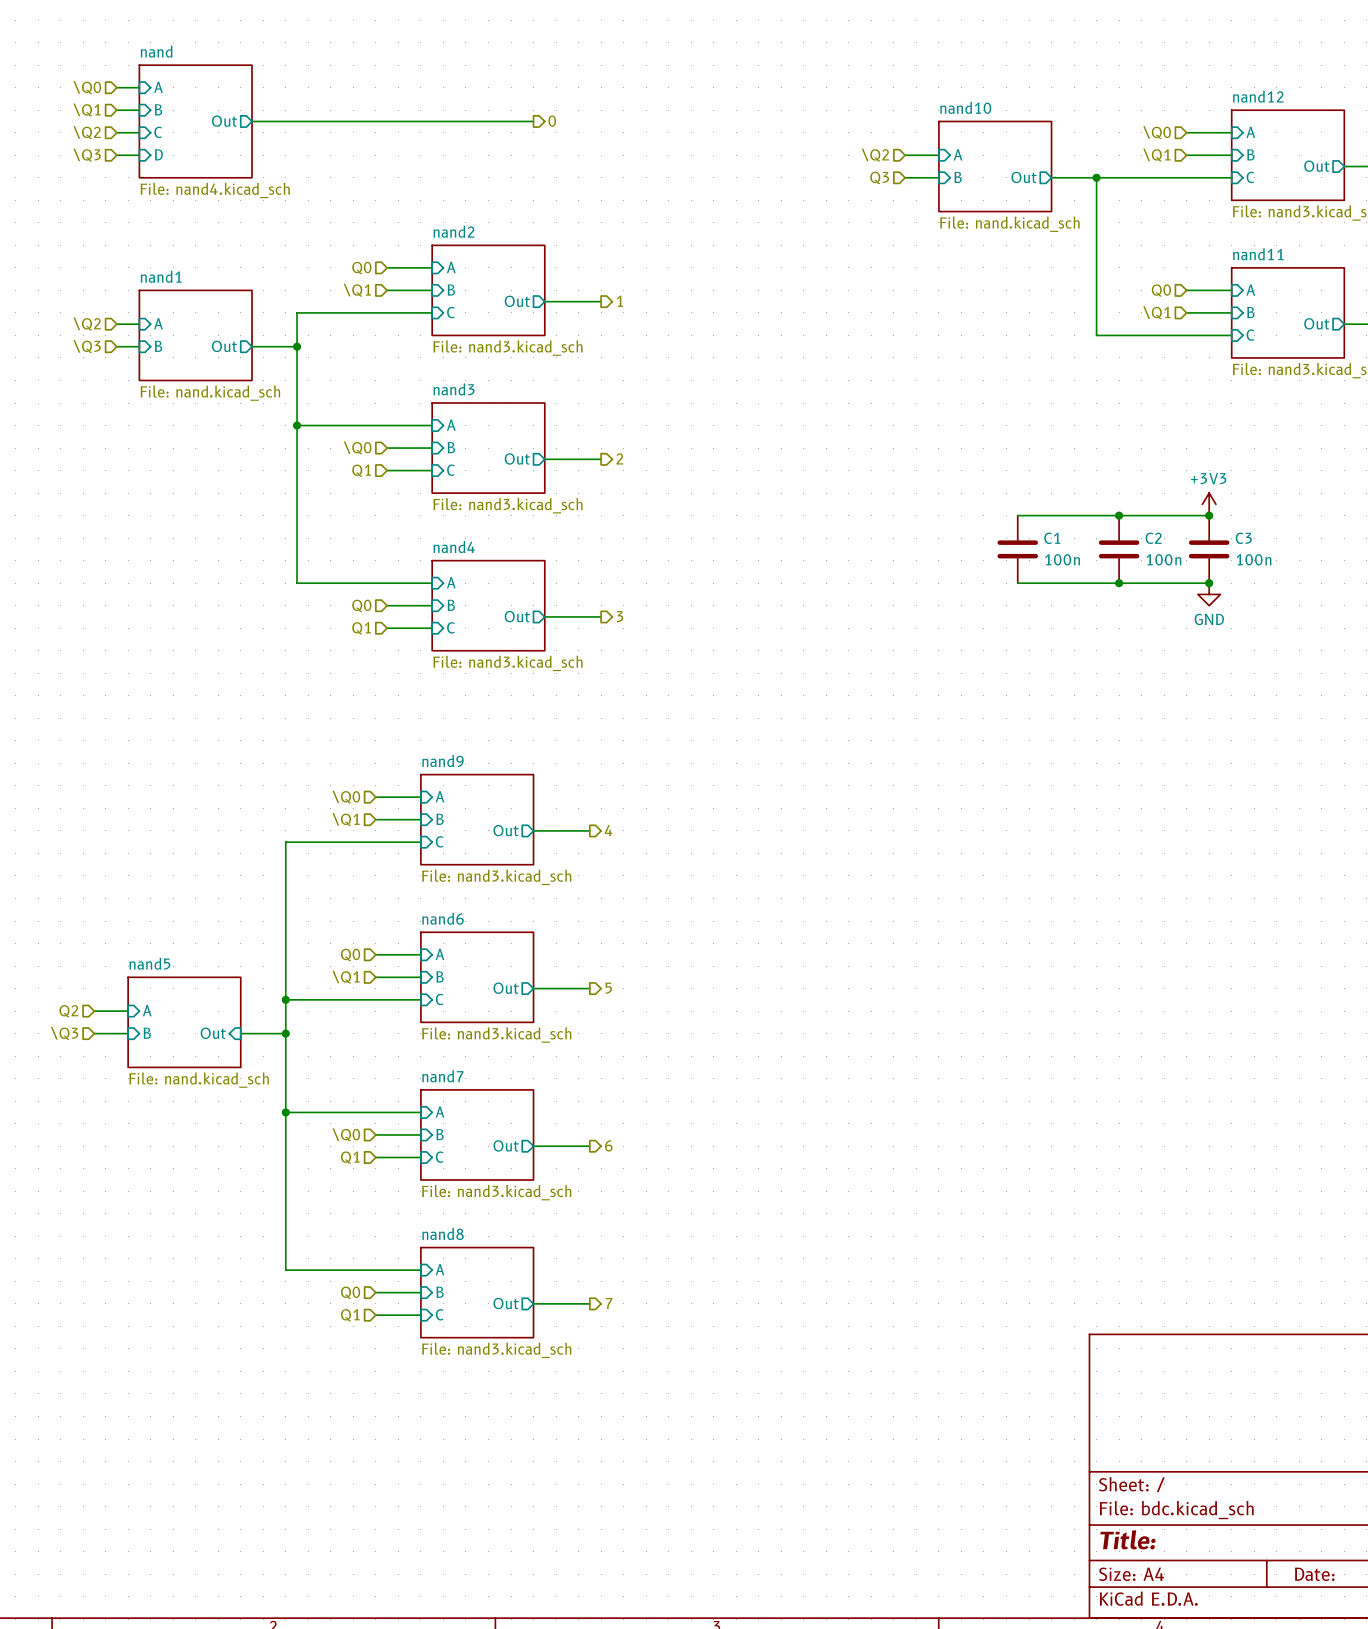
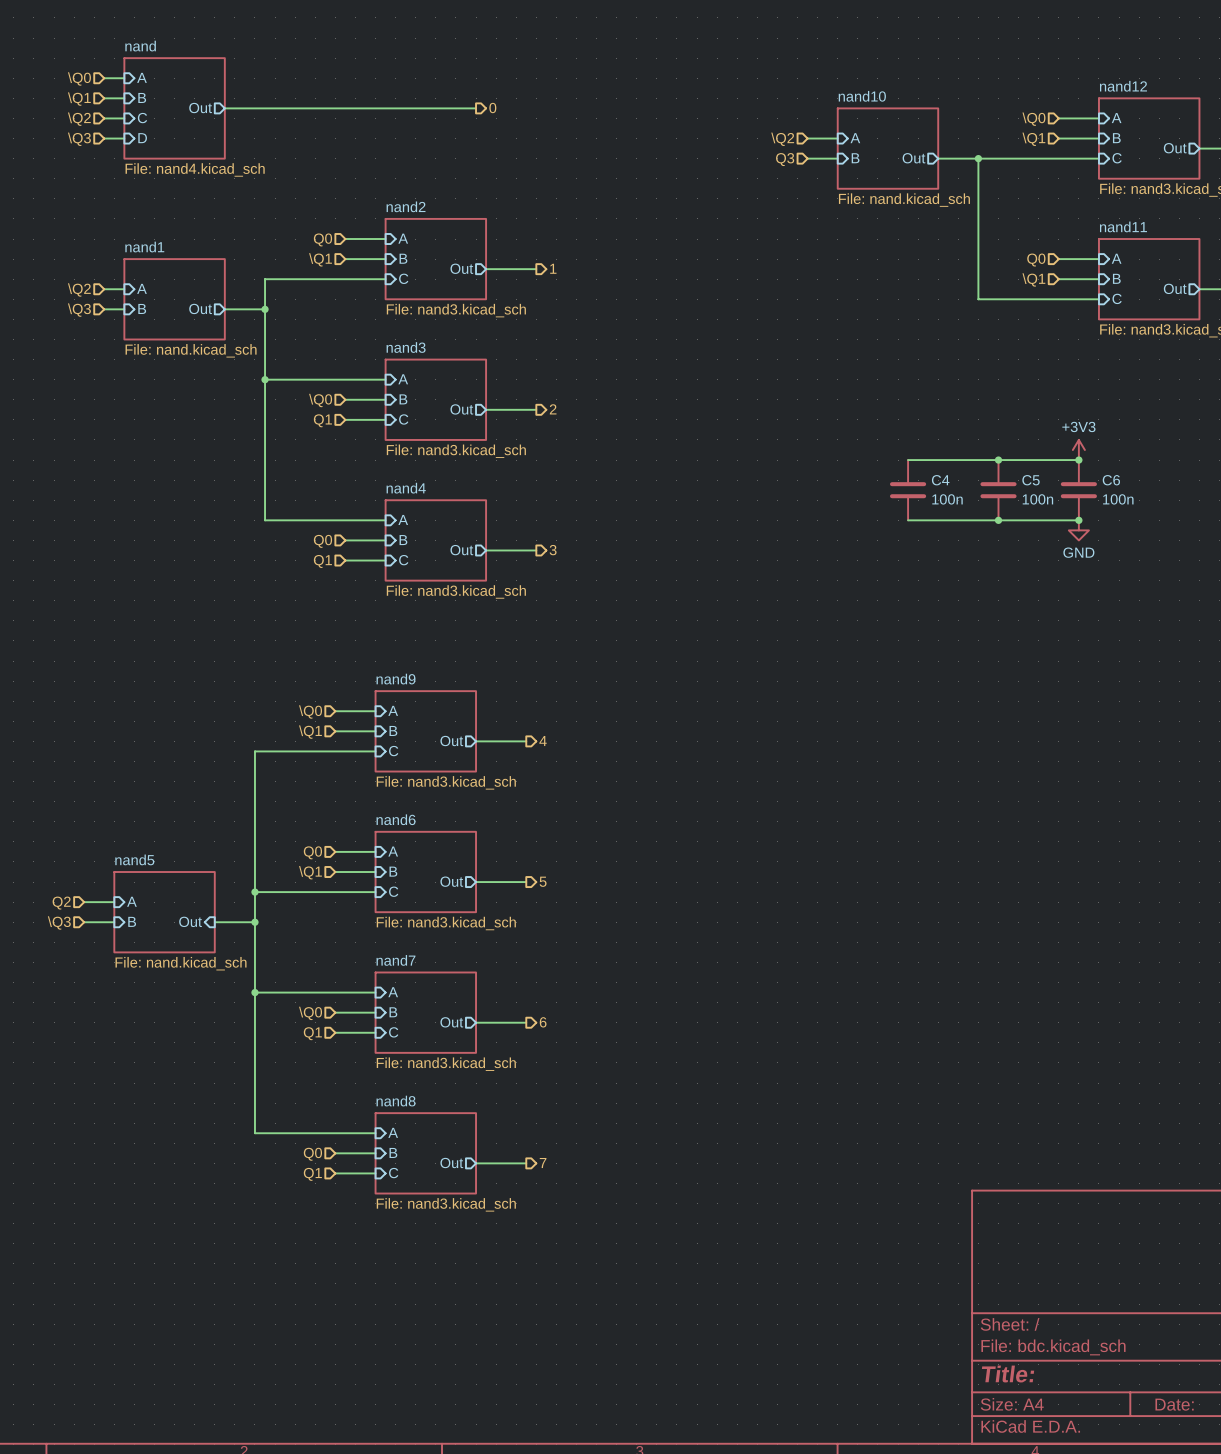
C1 name: C1 (1052, 538) -> C4 (940, 480)
C2 name: C2 (1153, 538) -> C5 (1031, 480)
C3 name: C3 (1243, 538) -> C6 (1111, 480)

